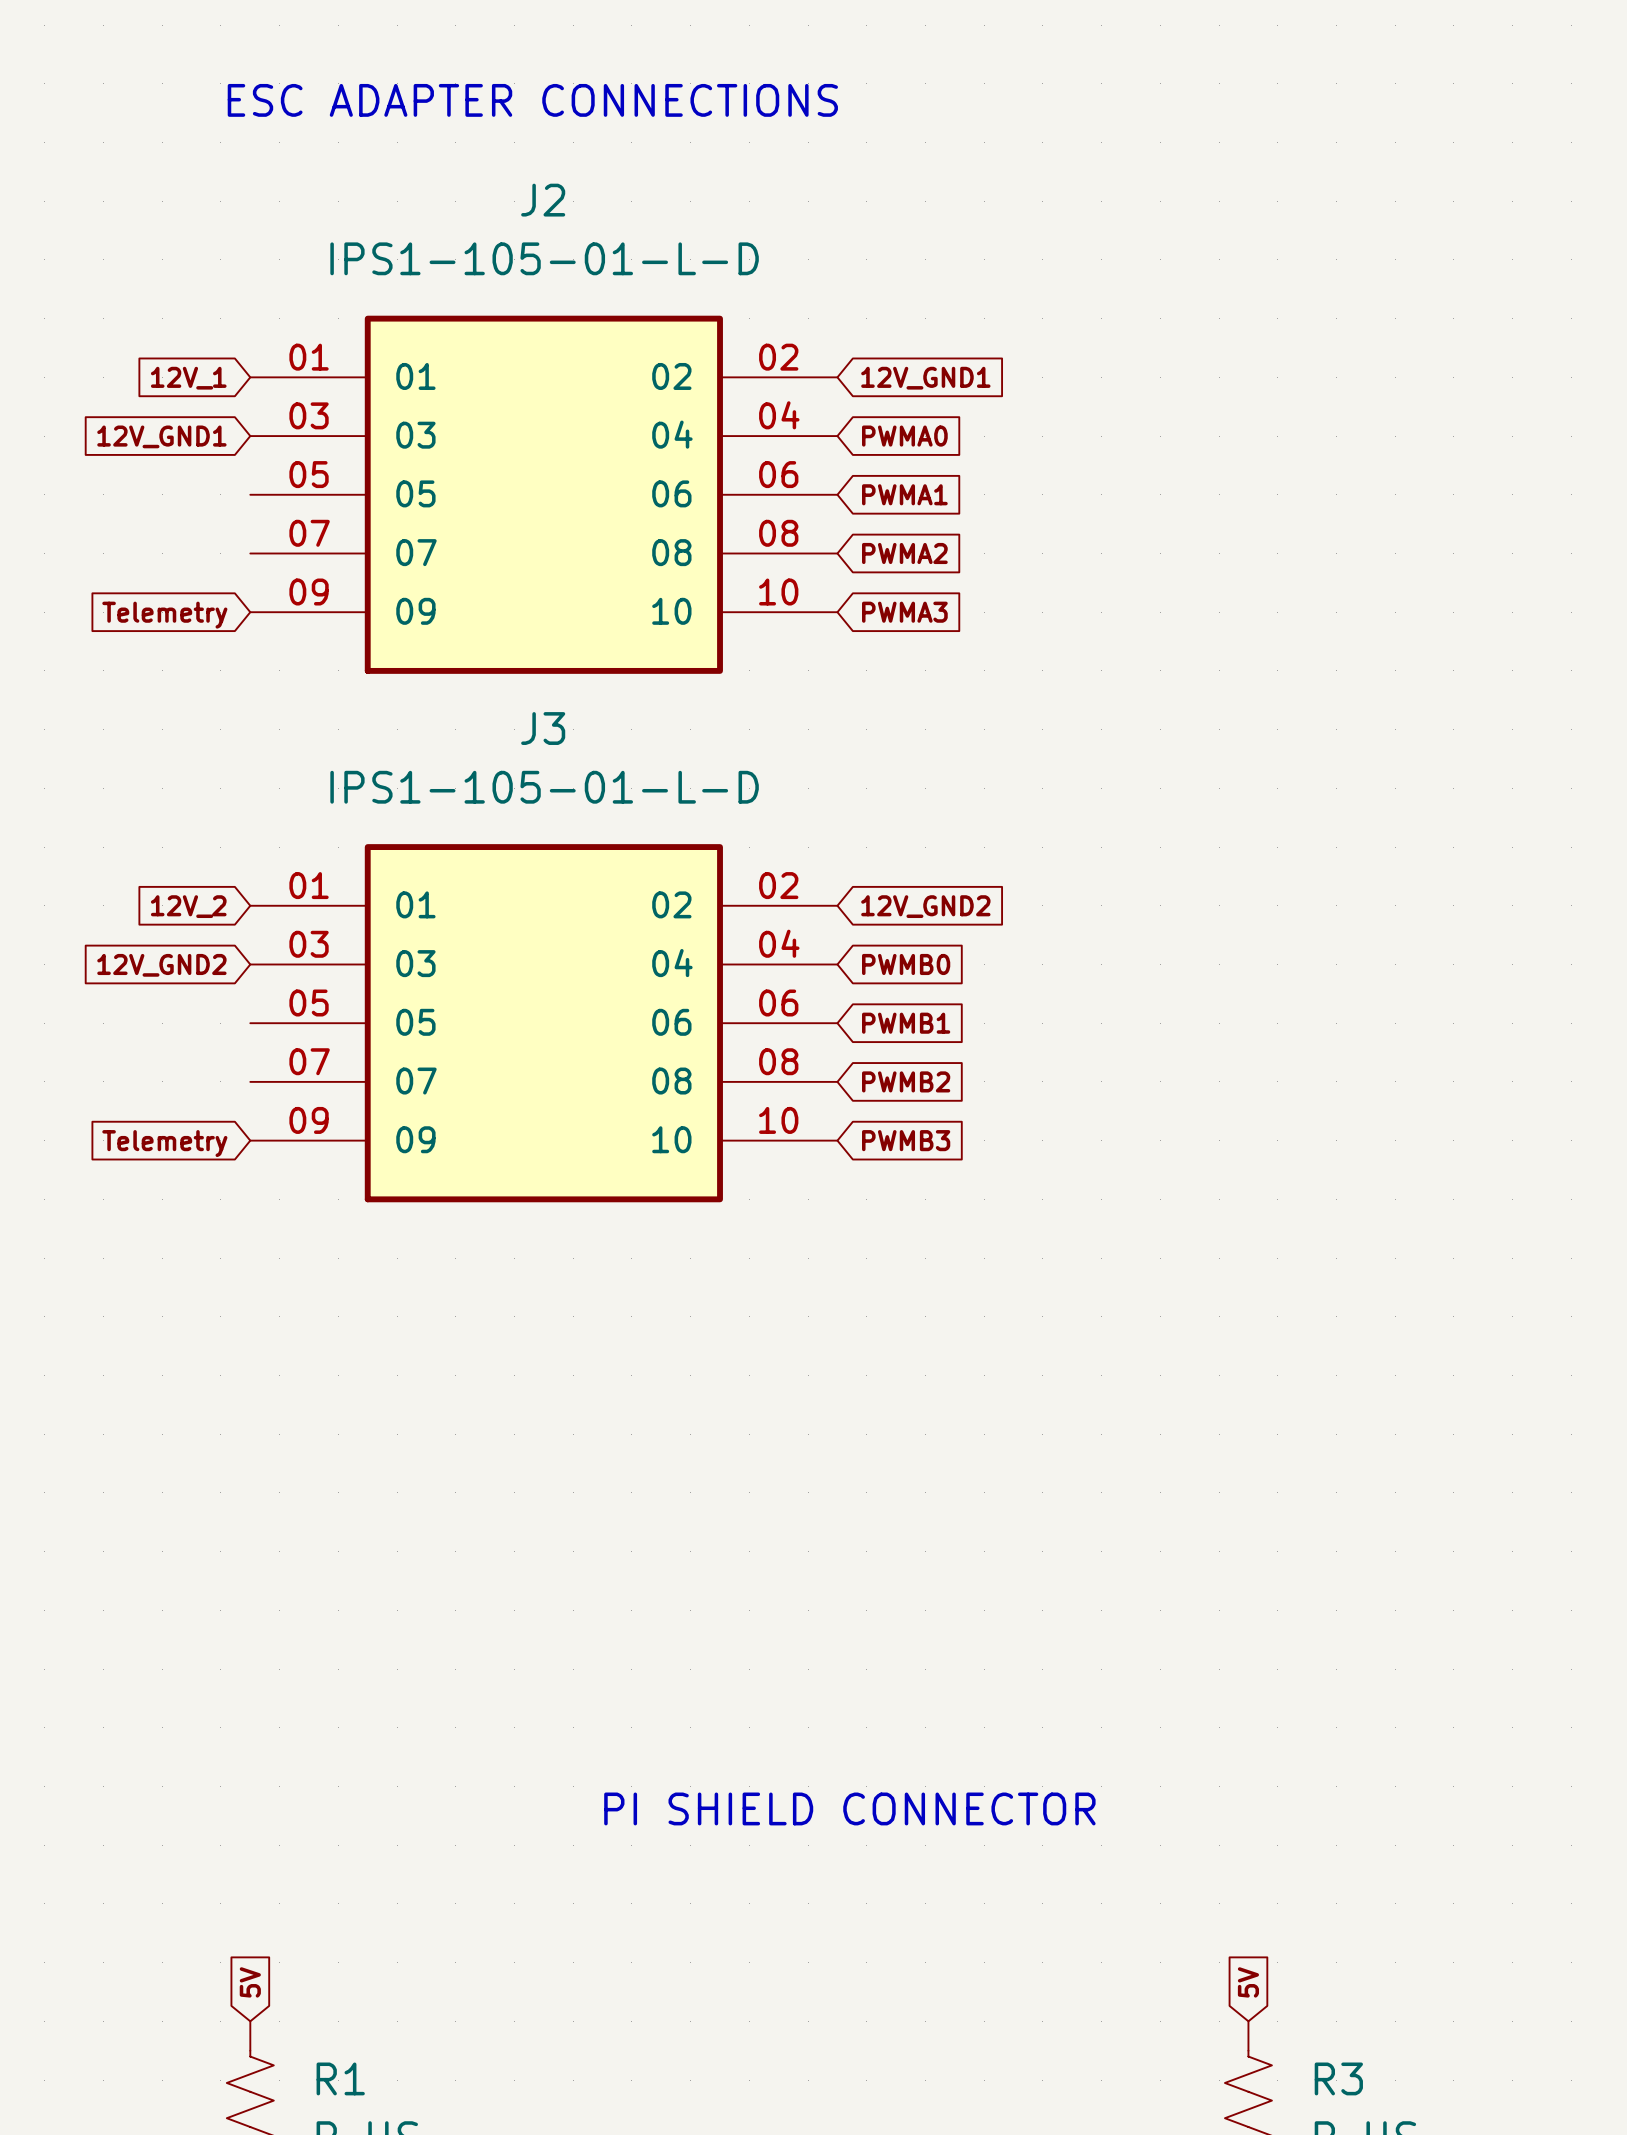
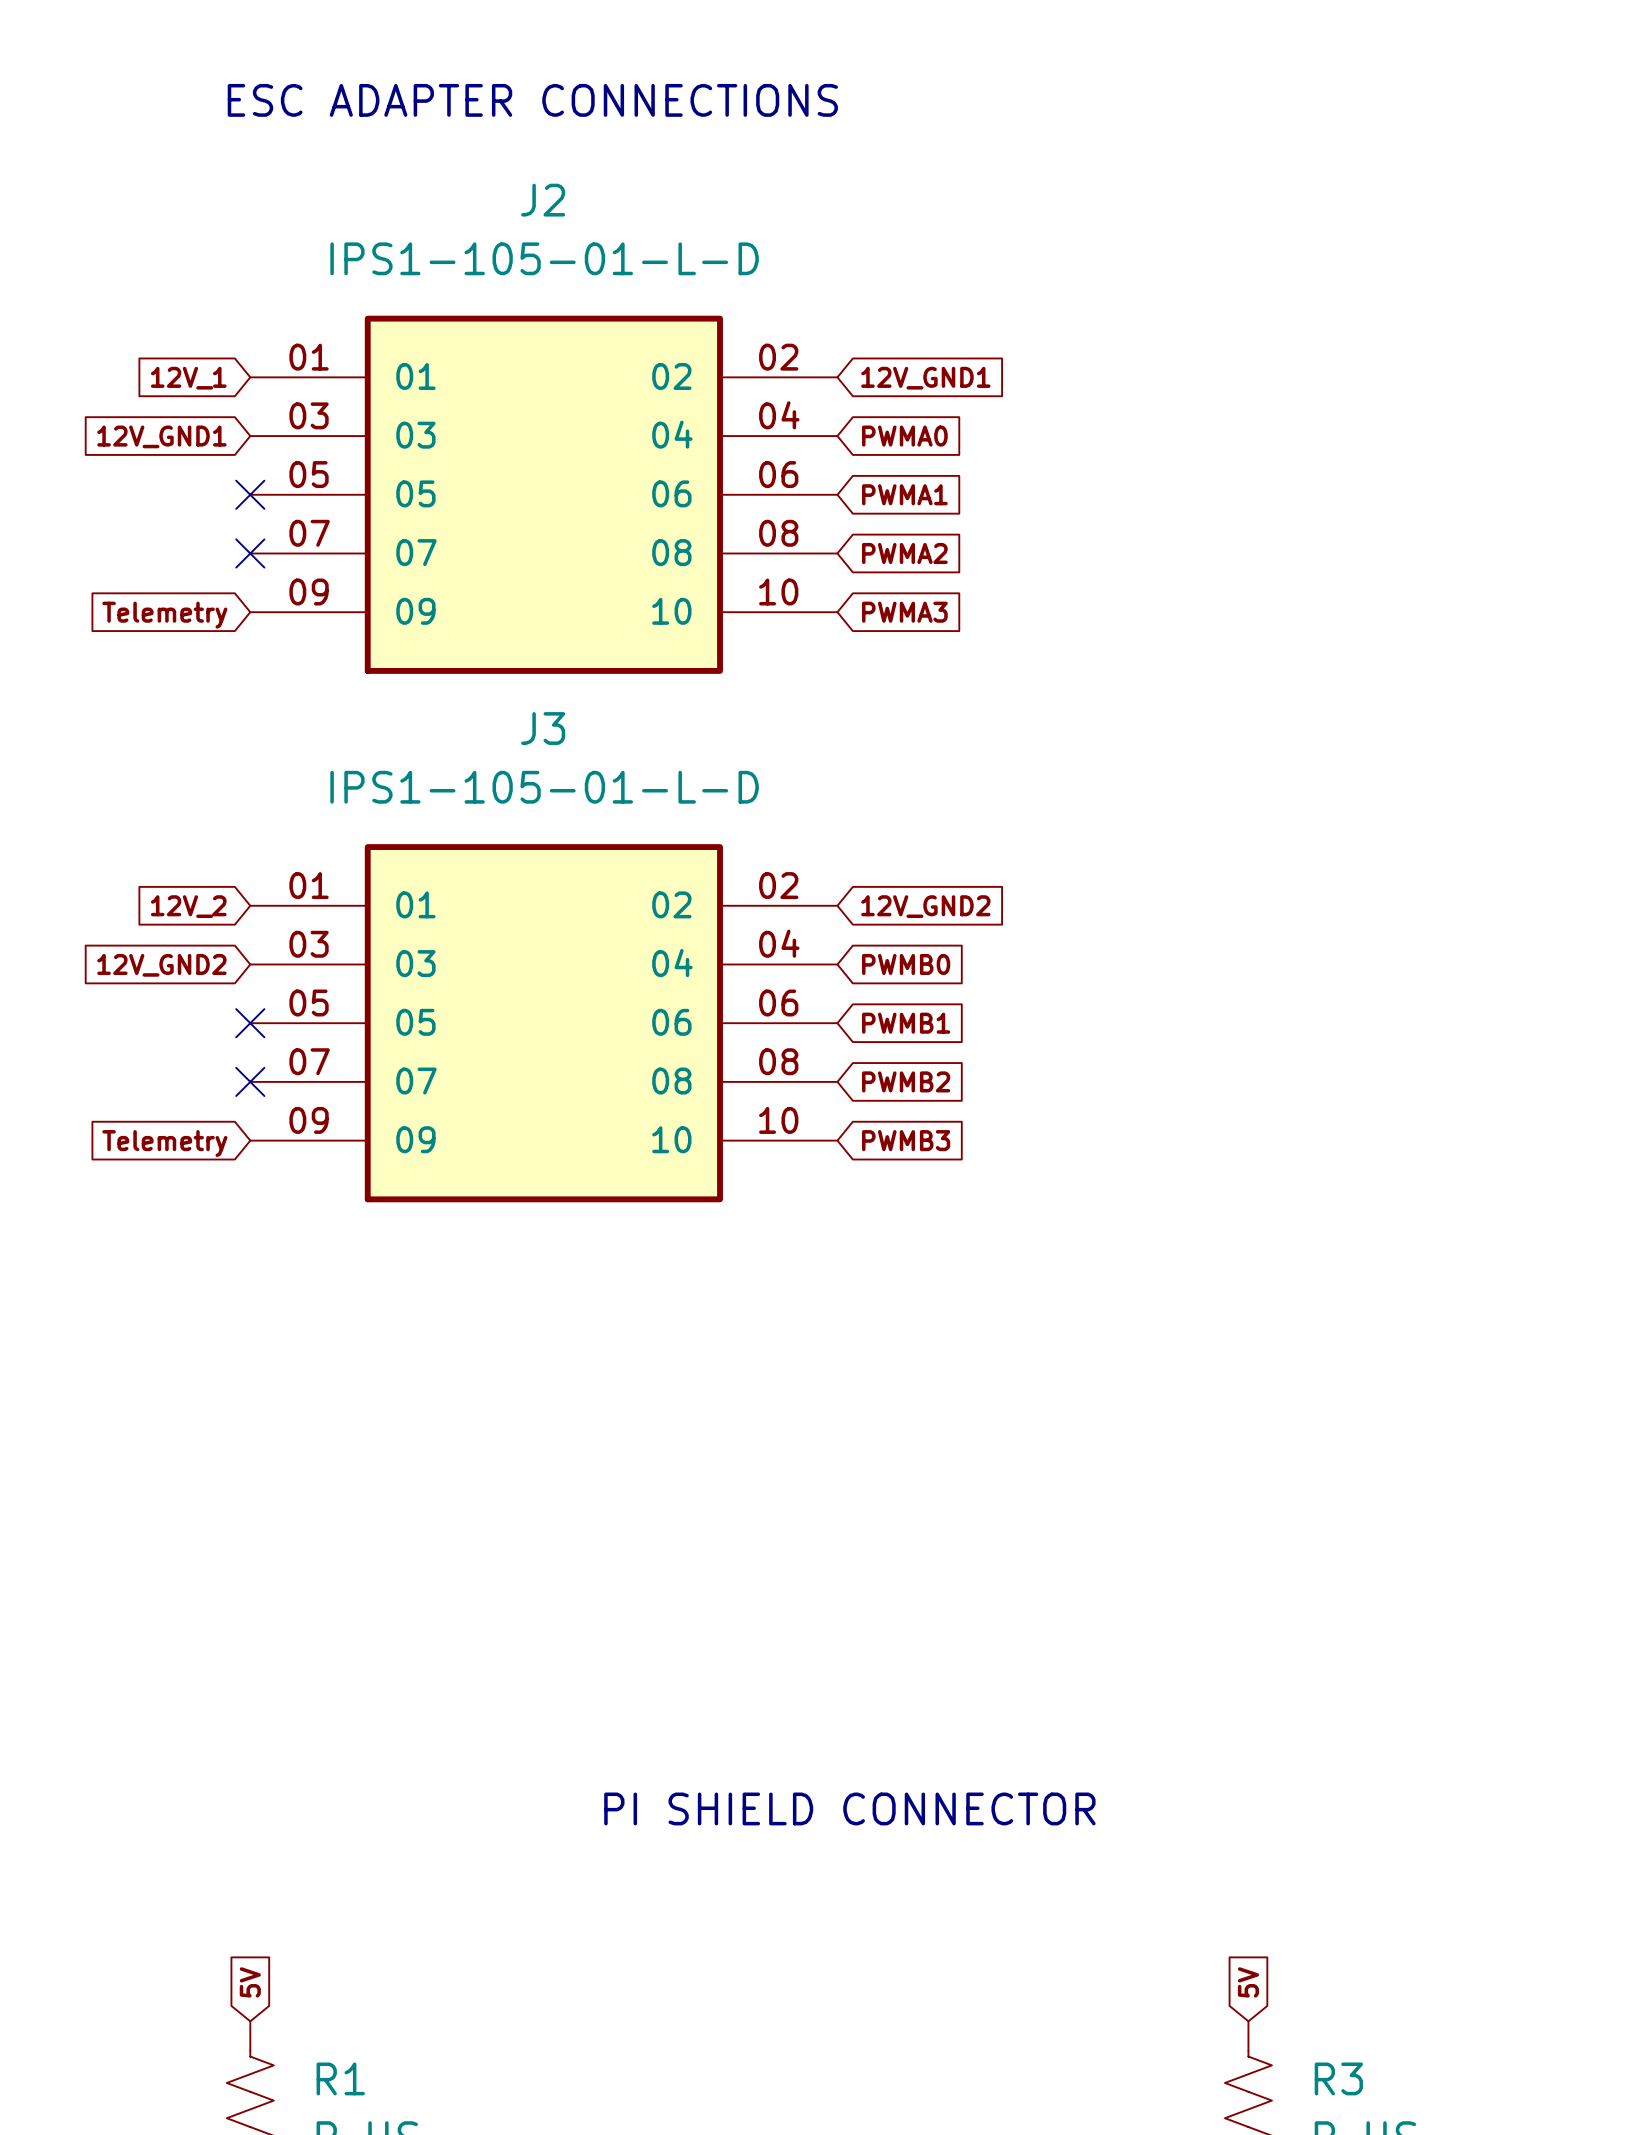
no-connect mark: none -> (250, 494)
no-connect mark: none -> (250, 553)
no-connect mark: none -> (250, 1023)
no-connect mark: none -> (250, 1081)

